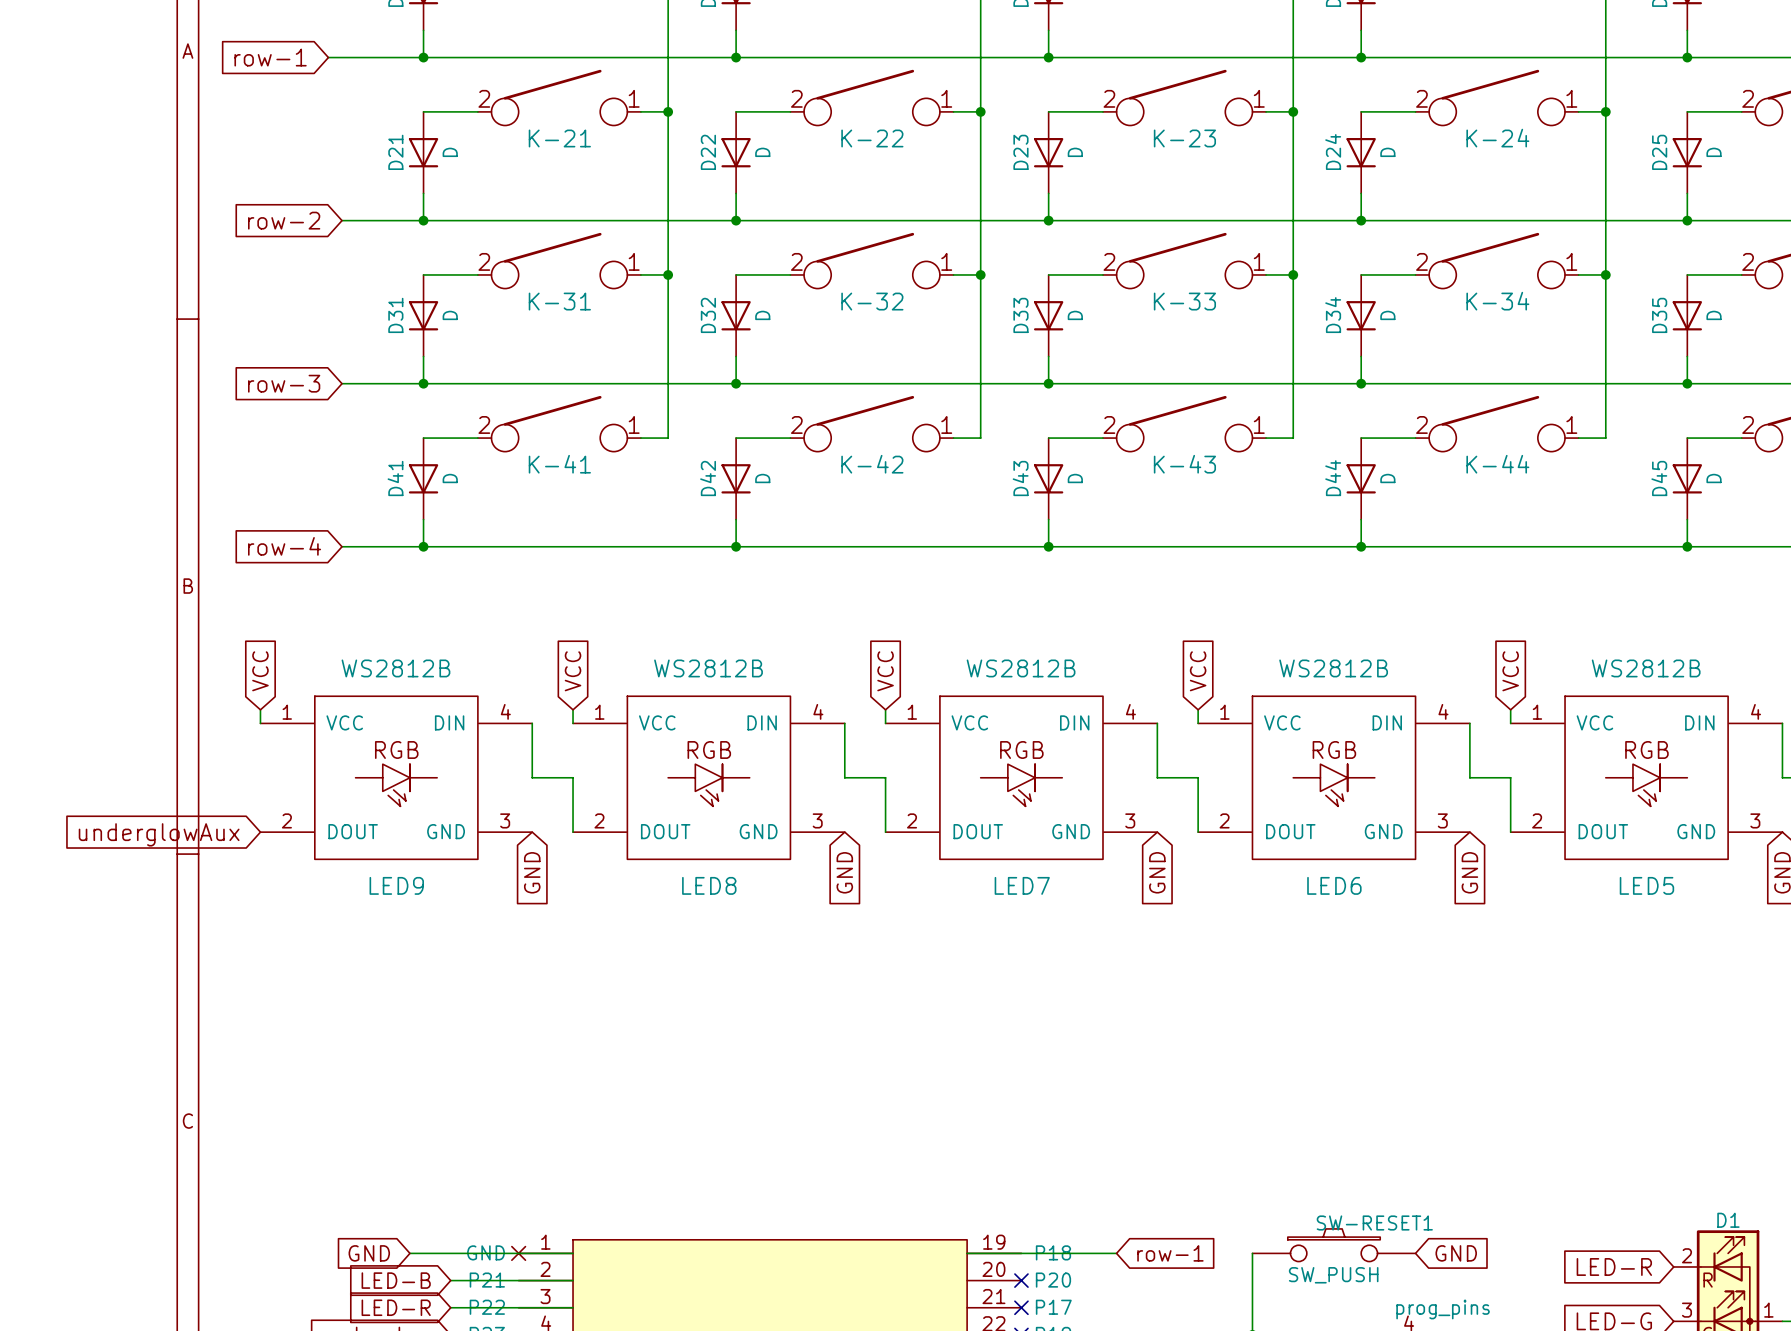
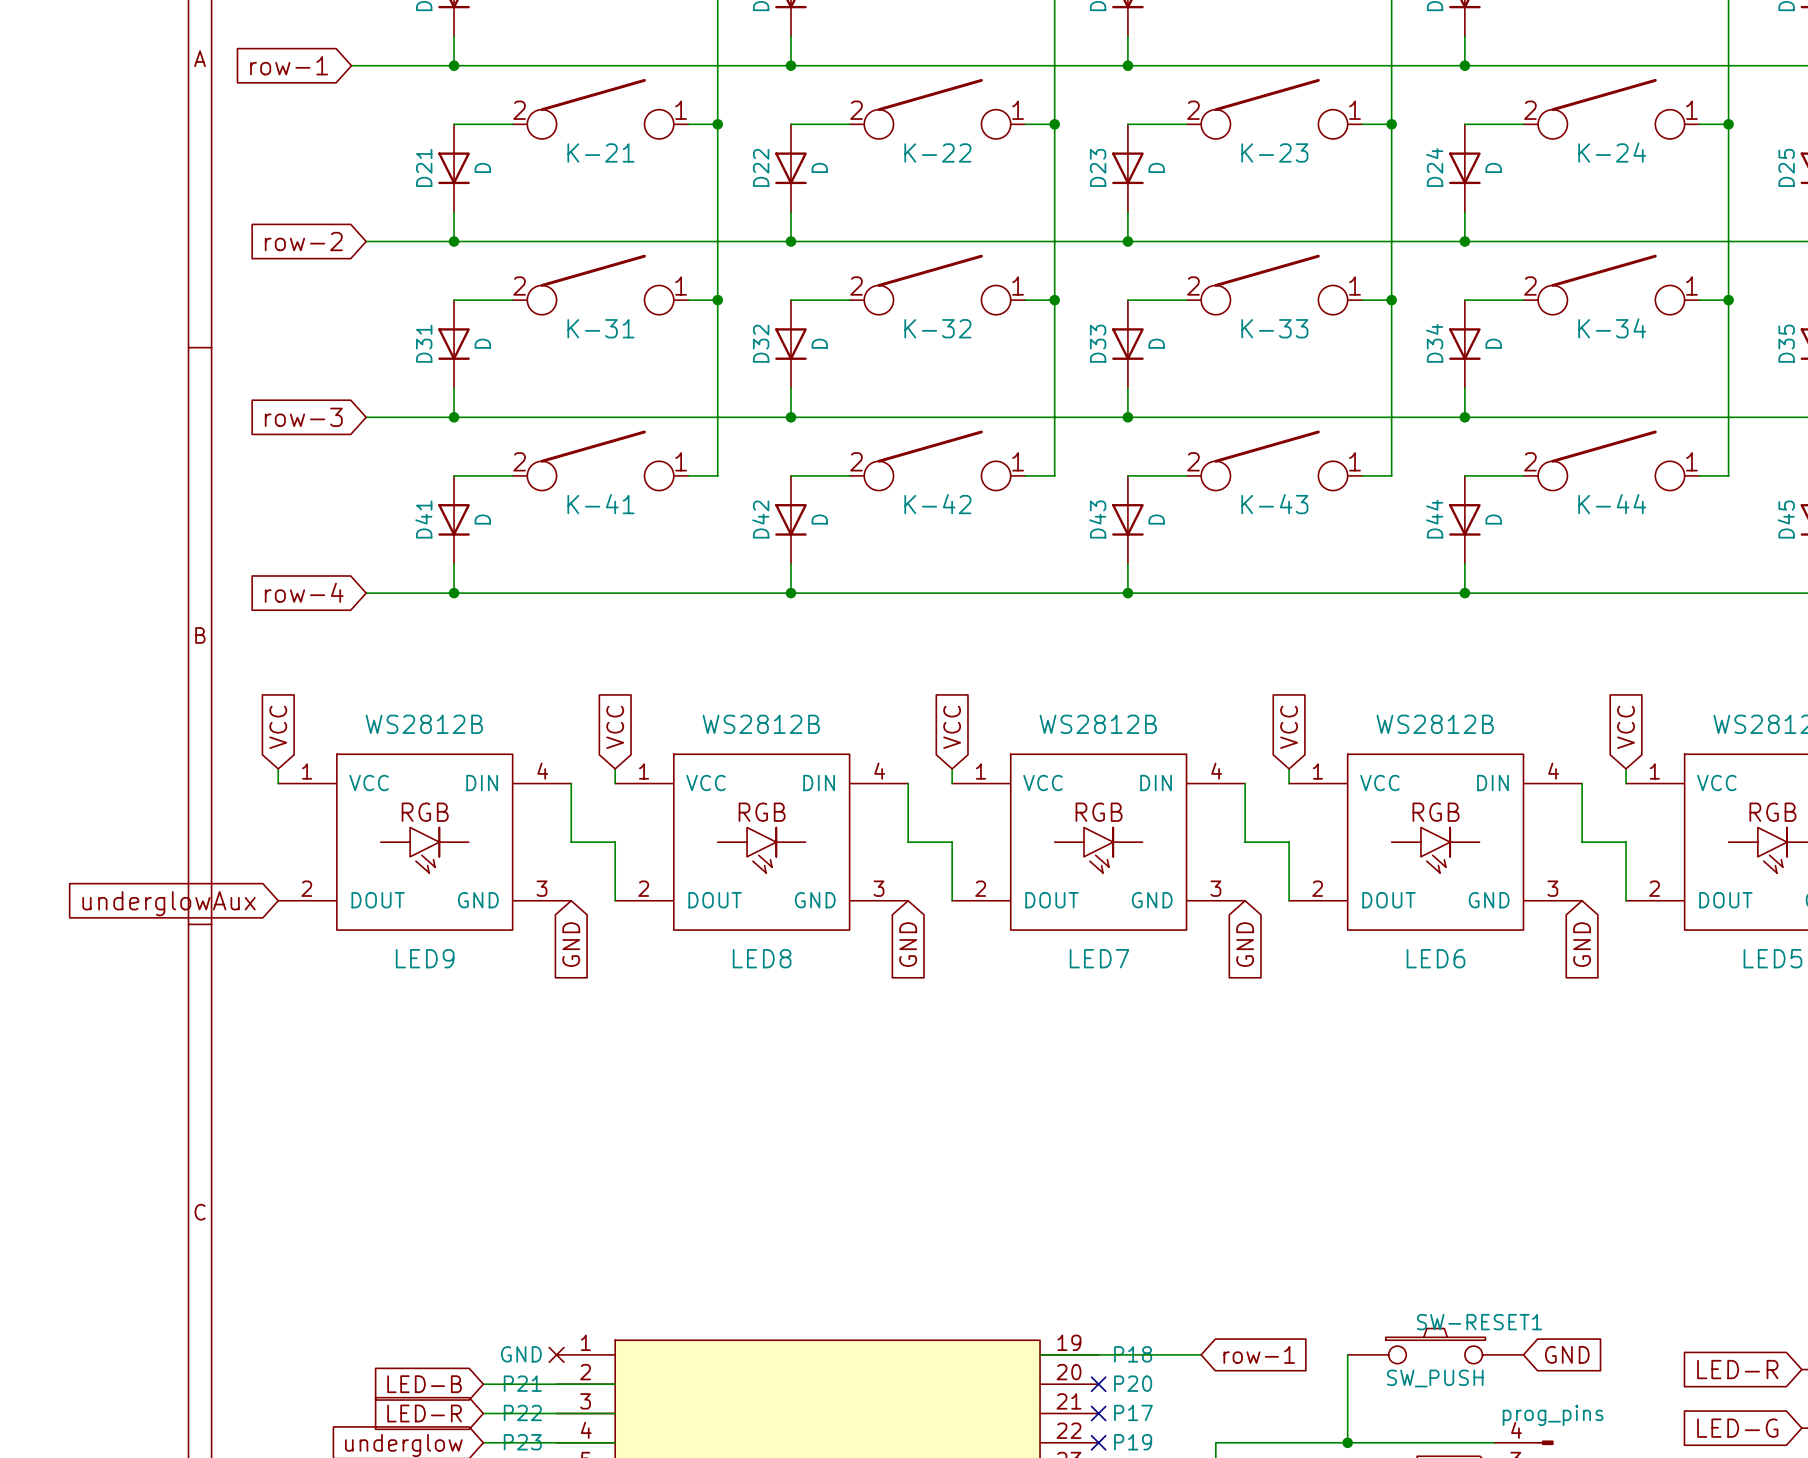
global label: GND (369, 1253) -> none
wire: (409, 1253) (573, 1253) -> none

